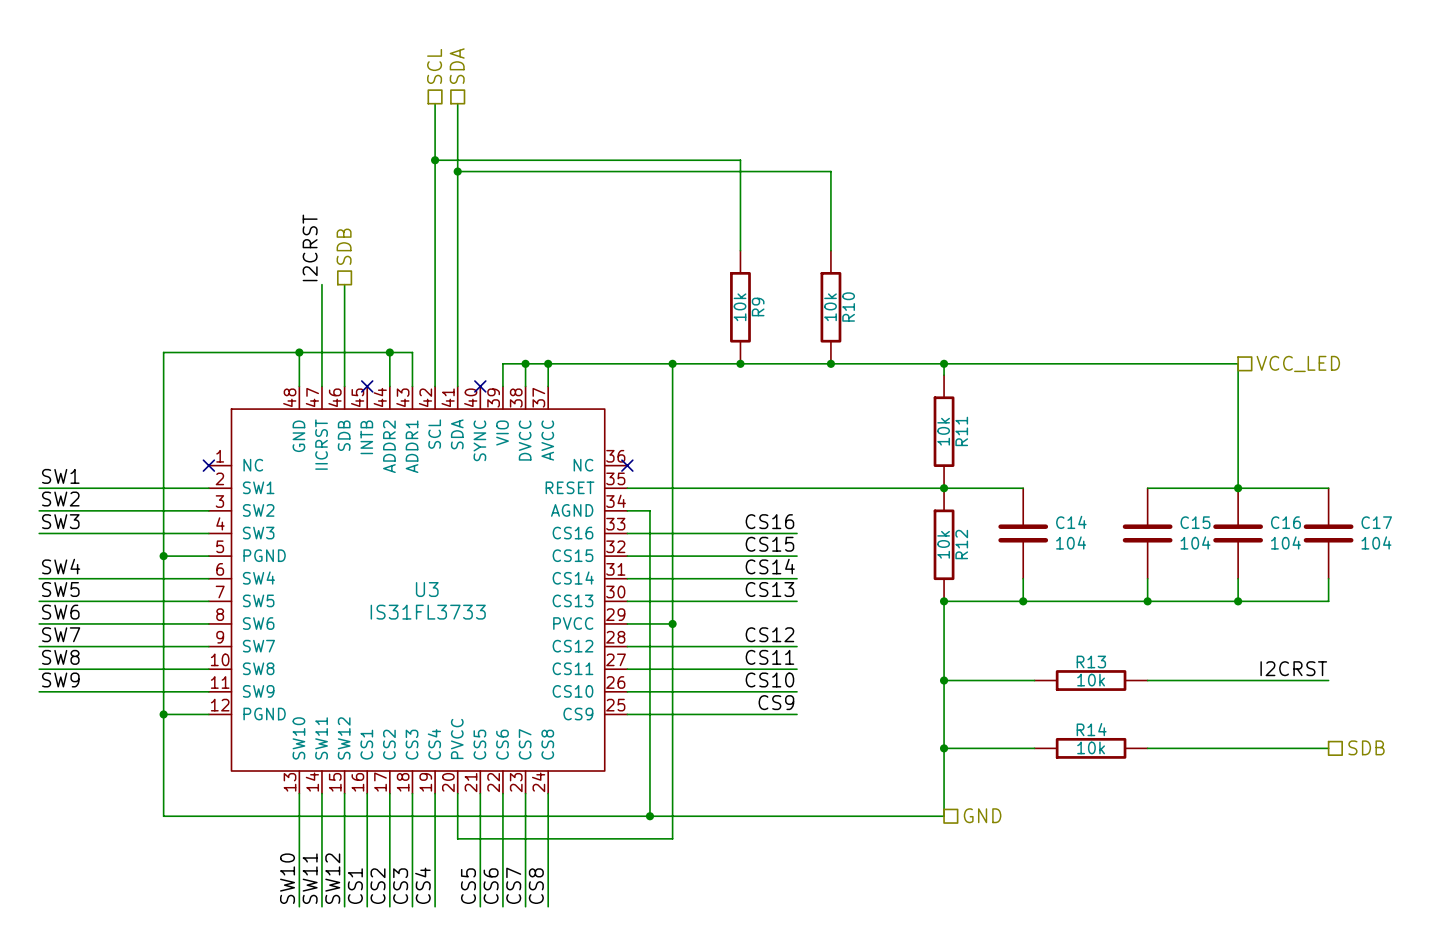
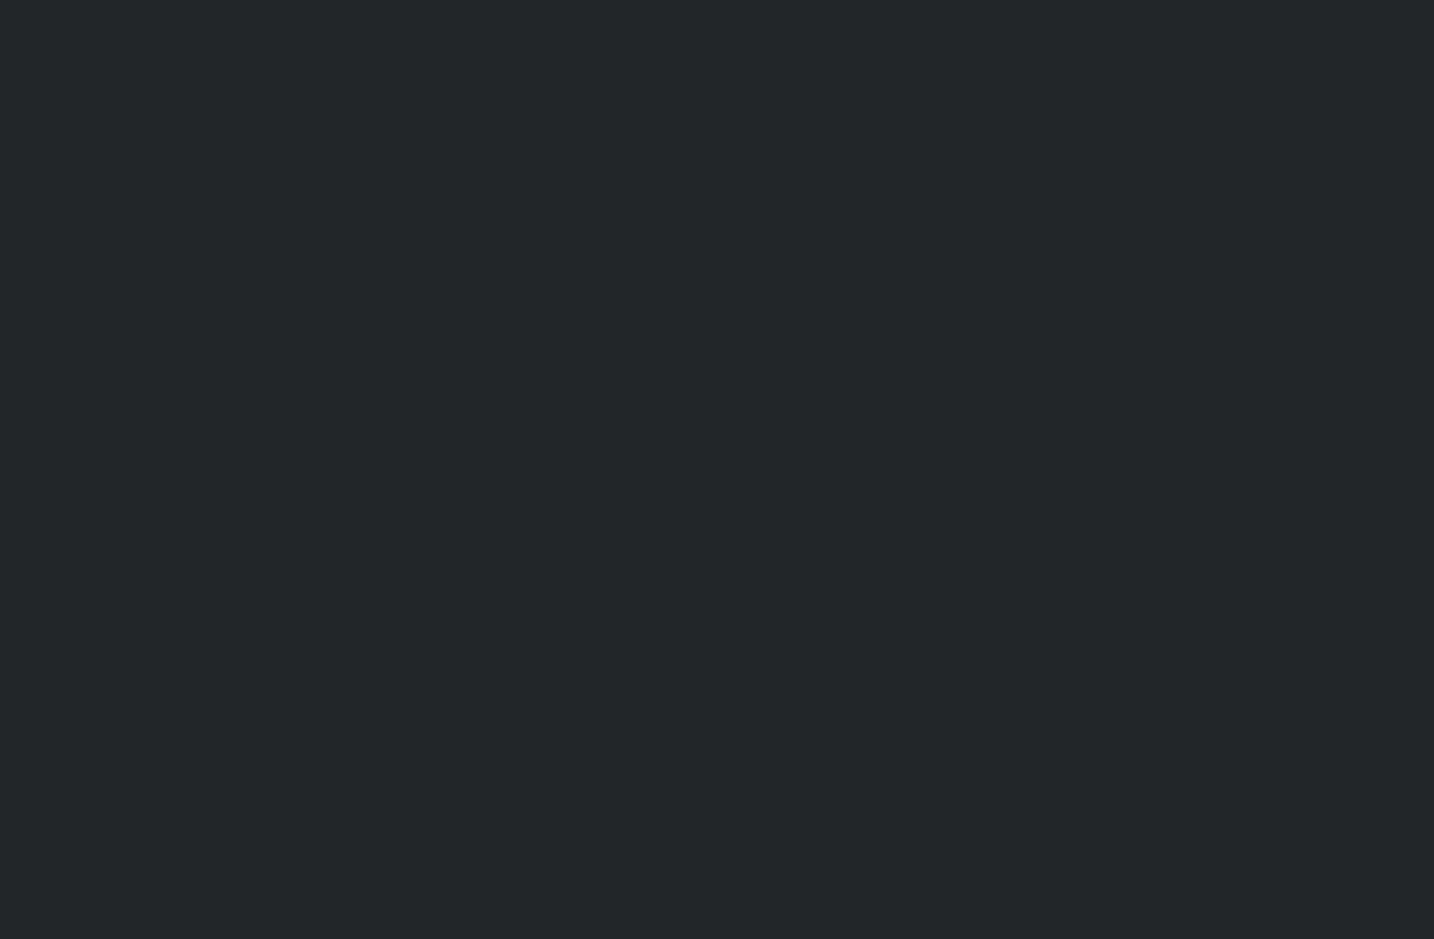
hierarchical label: SCL (434, 66) -> none
hierarchical label: SDA (457, 66) -> none
wire: (435, 103) (435, 386) -> none
wire: (457, 103) (457, 386) -> none
wire: (435, 160) (740, 160) (740, 250) -> none
junction: (435, 160) -> none
wire: (457, 171) (830, 171) (830, 250) -> none
junction: (457, 171) -> none
hierarchical label: SDB (344, 246) -> none
label: I2CRST (310, 247) -> none
wire: (321, 284) (321, 386) -> none
wire: (344, 284) (344, 386) -> none
R9: 10k (740, 307) -> none
R10: 10k (830, 307) -> none
wire: (299, 352) (299, 386) -> none
junction: (299, 352) -> none
wire: (389, 352) (389, 386) -> none
junction: (389, 352) -> none
wire: (525, 363) (525, 386) -> none
junction: (525, 363) -> none
wire: (548, 363) (548, 386) -> none
junction: (548, 363) -> none
wire: (672, 363) (672, 838) (457, 838) (457, 793) -> none
junction: (672, 363) -> none
junction: (740, 363) -> none
junction: (830, 363) -> none
wire: (944, 363) (944, 375) -> none
junction: (944, 363) -> none
hierarchical label: VCC_LED (1298, 363) -> none
no-connect mark: (367, 386) -> none
wire: (412, 386) (412, 352) (163, 352) (163, 816) (944, 816) (944, 601) (1328, 601) (1328, 578) -> none
no-connect mark: (480, 386) -> none
wire: (502, 386) (502, 363) (1238, 363) (1238, 488) -> none
R11: 10k (944, 431) -> none
no-connect mark: (208, 465) -> none
no-connect mark: (627, 465) -> none
label: SW1 (60, 476) -> none
wire: (39, 488) (208, 488) -> none
wire: (627, 488) (1023, 488) -> none
junction: (944, 488) -> none
wire: (1147, 488) (1328, 488) -> none
junction: (1238, 488) -> none
label: SW2 (60, 499) -> none
wire: (39, 510) (208, 510) -> none
wire: (627, 510) (649, 510) (649, 816) -> none
label: SW3 (60, 521) -> none
label: CS16 (769, 521) -> none
wire: (39, 533) (208, 533) -> none
wire: (627, 533) (797, 533) -> none
C14: 104 (1023, 533) -> none
C15: 104 (1147, 533) -> none
C16: 104 (1238, 533) -> none
C17: 104 (1328, 533) -> none
label: CS15 (769, 544) -> none
R12: 10k (944, 544) -> none
wire: (163, 556) (208, 556) -> none
junction: (163, 556) -> none
wire: (627, 556) (797, 556) -> none
label: SW4 (61, 566) -> none
label: CS14 (770, 566) -> none
wire: (39, 578) (208, 578) -> none
wire: (627, 578) (797, 578) -> none
wire: (1023, 578) (1023, 601) -> none
wire: (1147, 578) (1147, 601) -> none
wire: (1238, 578) (1238, 601) -> none
label: SW5 (60, 589) -> none
label: CS13 (769, 589) -> none
U3: IS31FL3733 (418, 590) -> none
wire: (39, 601) (208, 601) -> none
wire: (627, 601) (797, 601) -> none
junction: (944, 601) -> none
junction: (1023, 601) -> none
junction: (1147, 601) -> none
junction: (1238, 601) -> none
label: SW6 (60, 612) -> none
wire: (39, 623) (208, 623) -> none
wire: (627, 623) (672, 623) -> none
junction: (672, 623) -> none
label: SW7 (61, 634) -> none
label: CS12 (769, 634) -> none
wire: (39, 646) (208, 646) -> none
wire: (627, 646) (797, 646) -> none
label: SW8 (60, 657) -> none
label: CS11 (769, 657) -> none
label: I2CRST (1293, 668) -> none
wire: (39, 669) (208, 669) -> none
wire: (627, 669) (797, 669) -> none
label: SW9 (60, 679) -> none
label: CS10 (769, 679) -> none
wire: (944, 680) (1034, 680) -> none
junction: (944, 680) -> none
R13: 10k (1091, 680) -> none
wire: (1147, 680) (1328, 680) -> none
wire: (39, 691) (208, 691) -> none
wire: (627, 691) (797, 691) -> none
label: CS9 (776, 702) -> none
wire: (163, 714) (208, 714) -> none
junction: (163, 714) -> none
wire: (627, 714) (797, 714) -> none
hierarchical label: SDB (1366, 747) -> none
wire: (944, 748) (1034, 748) -> none
junction: (944, 748) -> none
R14: 10k (1091, 748) -> none
wire: (1147, 748) (1328, 748) -> none
wire: (299, 793) (299, 906) -> none
wire: (321, 793) (321, 906) -> none
wire: (344, 793) (344, 906) -> none
wire: (367, 793) (367, 906) -> none
wire: (389, 793) (389, 906) -> none
wire: (412, 793) (412, 906) -> none
wire: (435, 793) (435, 906) -> none
wire: (480, 793) (480, 906) -> none
wire: (502, 793) (502, 906) -> none
wire: (525, 793) (525, 906) -> none
wire: (548, 793) (548, 906) -> none
hierarchical label: GND (982, 815) -> none
junction: (649, 816) -> none
label: SW10 (287, 878) -> none
label: SW11 (310, 878) -> none
label: SW12 (332, 878) -> none
label: CS4 (422, 885) -> none
label: CS7 (513, 885) -> none
label: CS1 (355, 886) -> none
label: CS2 (378, 886) -> none
label: CS3 (400, 886) -> none
label: CS5 (468, 886) -> none
label: CS6 (491, 886) -> none
label: CS8 (536, 886) -> none

